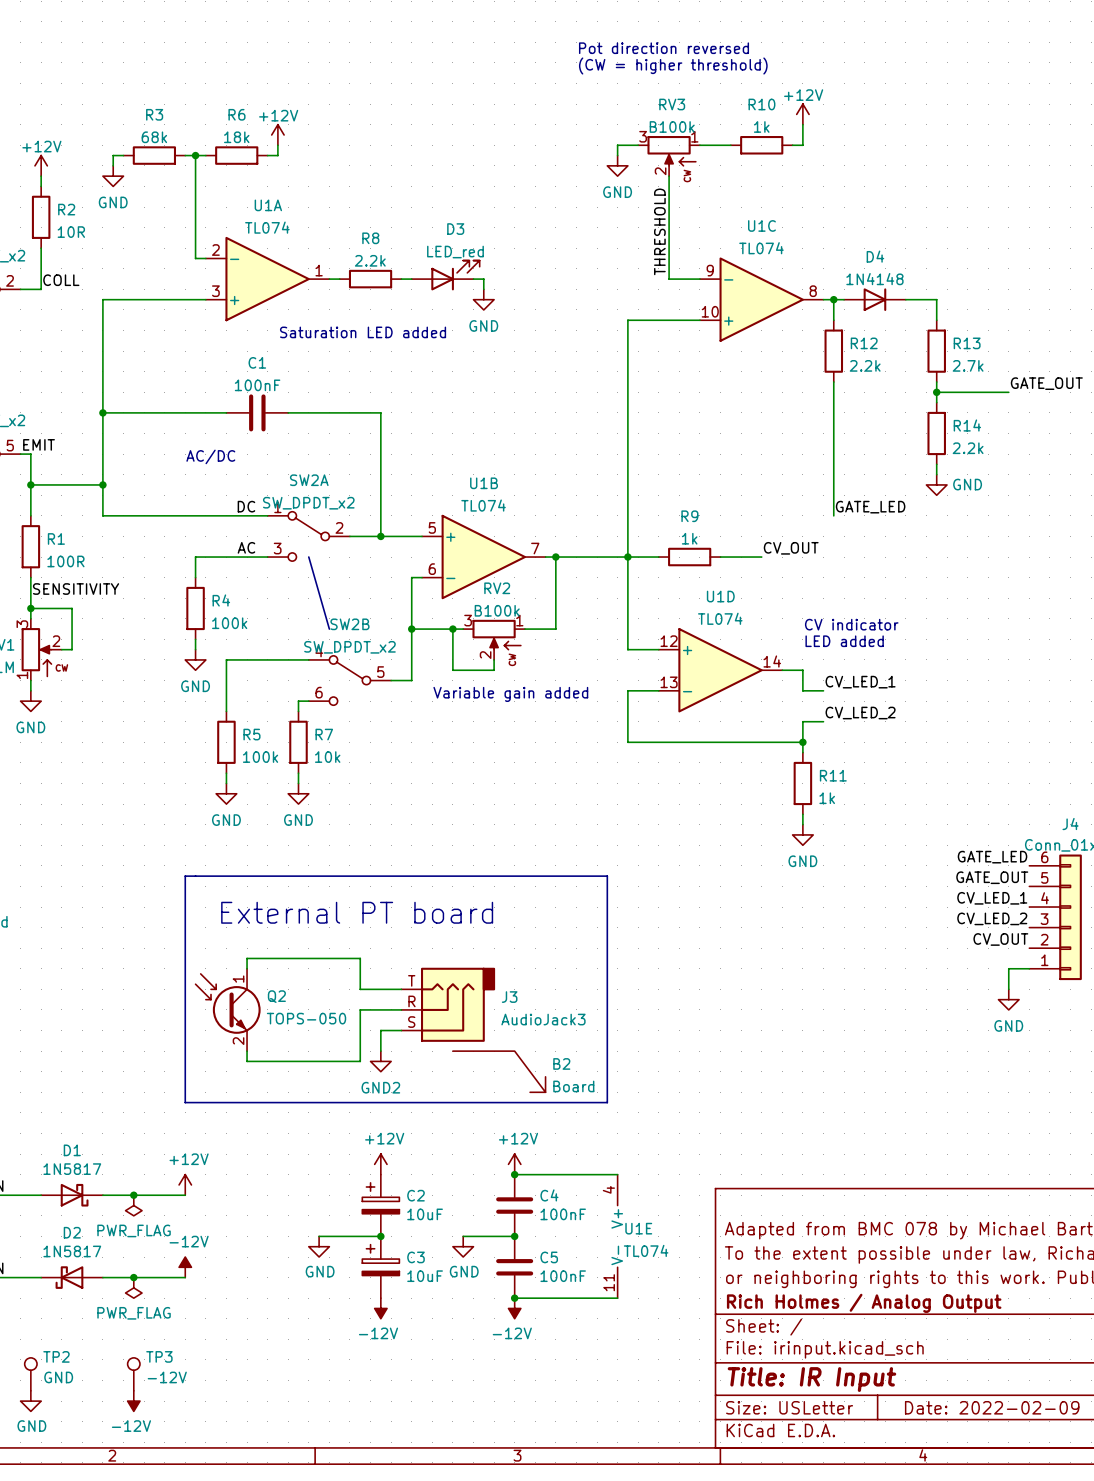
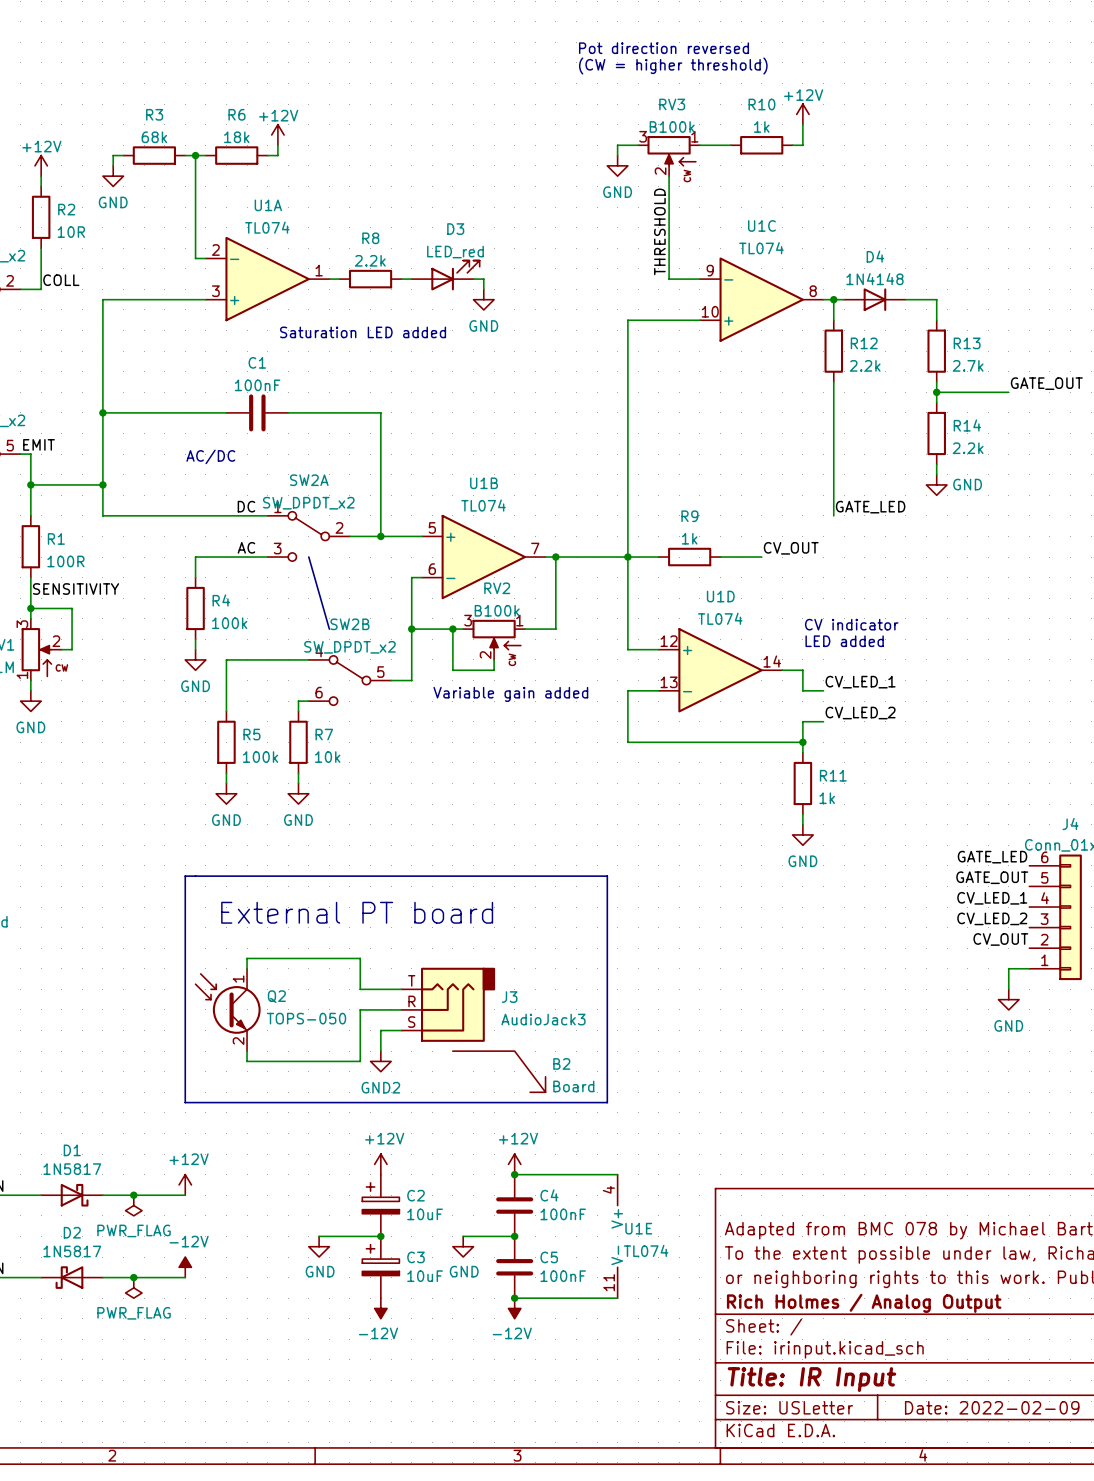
TP2: GND (30, 1374) -> none
TP3: -12V (133, 1374) -> none
power symbol: GND (30, 1401) -> none
power symbol: -12V (133, 1401) -> none

